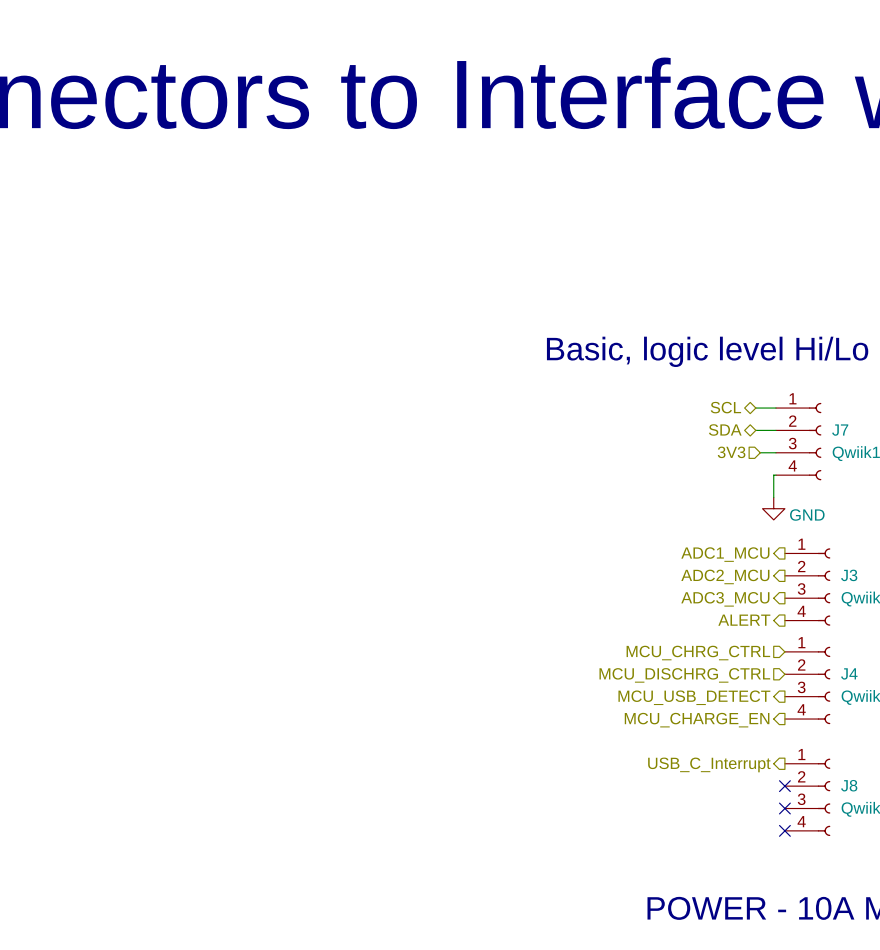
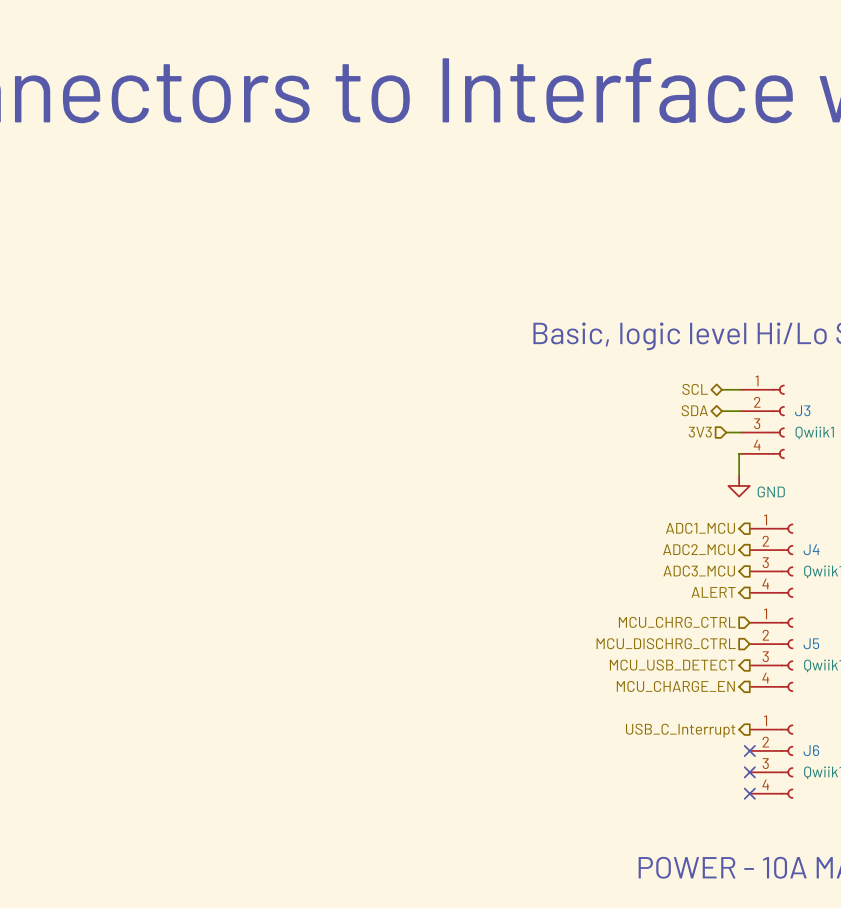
J7 name: J7 (840, 430) -> J3 (802, 410)
J3 name: J3 (849, 575) -> J4 (811, 549)
J4 name: J4 (849, 673) -> J5 (811, 643)
J8 name: J8 (849, 785) -> J6 (811, 750)

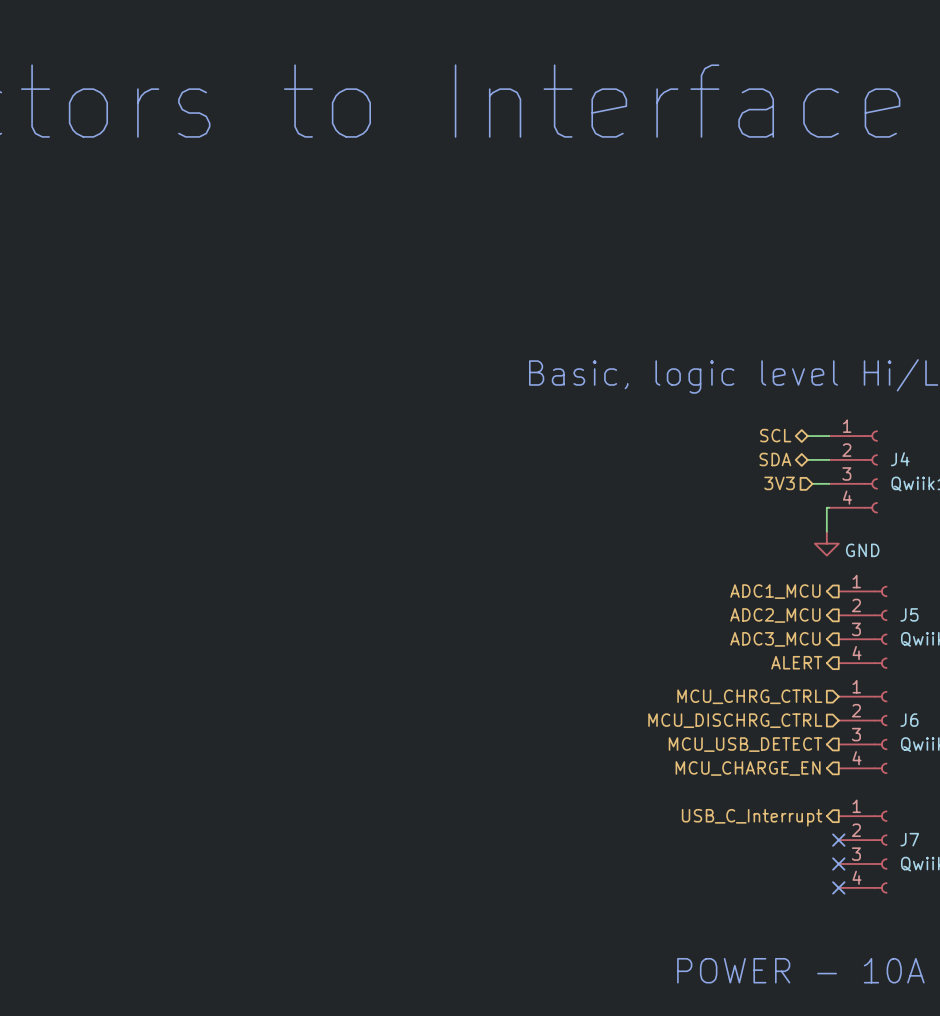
J3 name: J3 (802, 410) -> J4 (900, 459)
J4 name: J4 (811, 549) -> J5 (909, 614)
J5 name: J5 (811, 643) -> J6 (909, 720)
J6 name: J6 (811, 750) -> J7 (909, 839)

